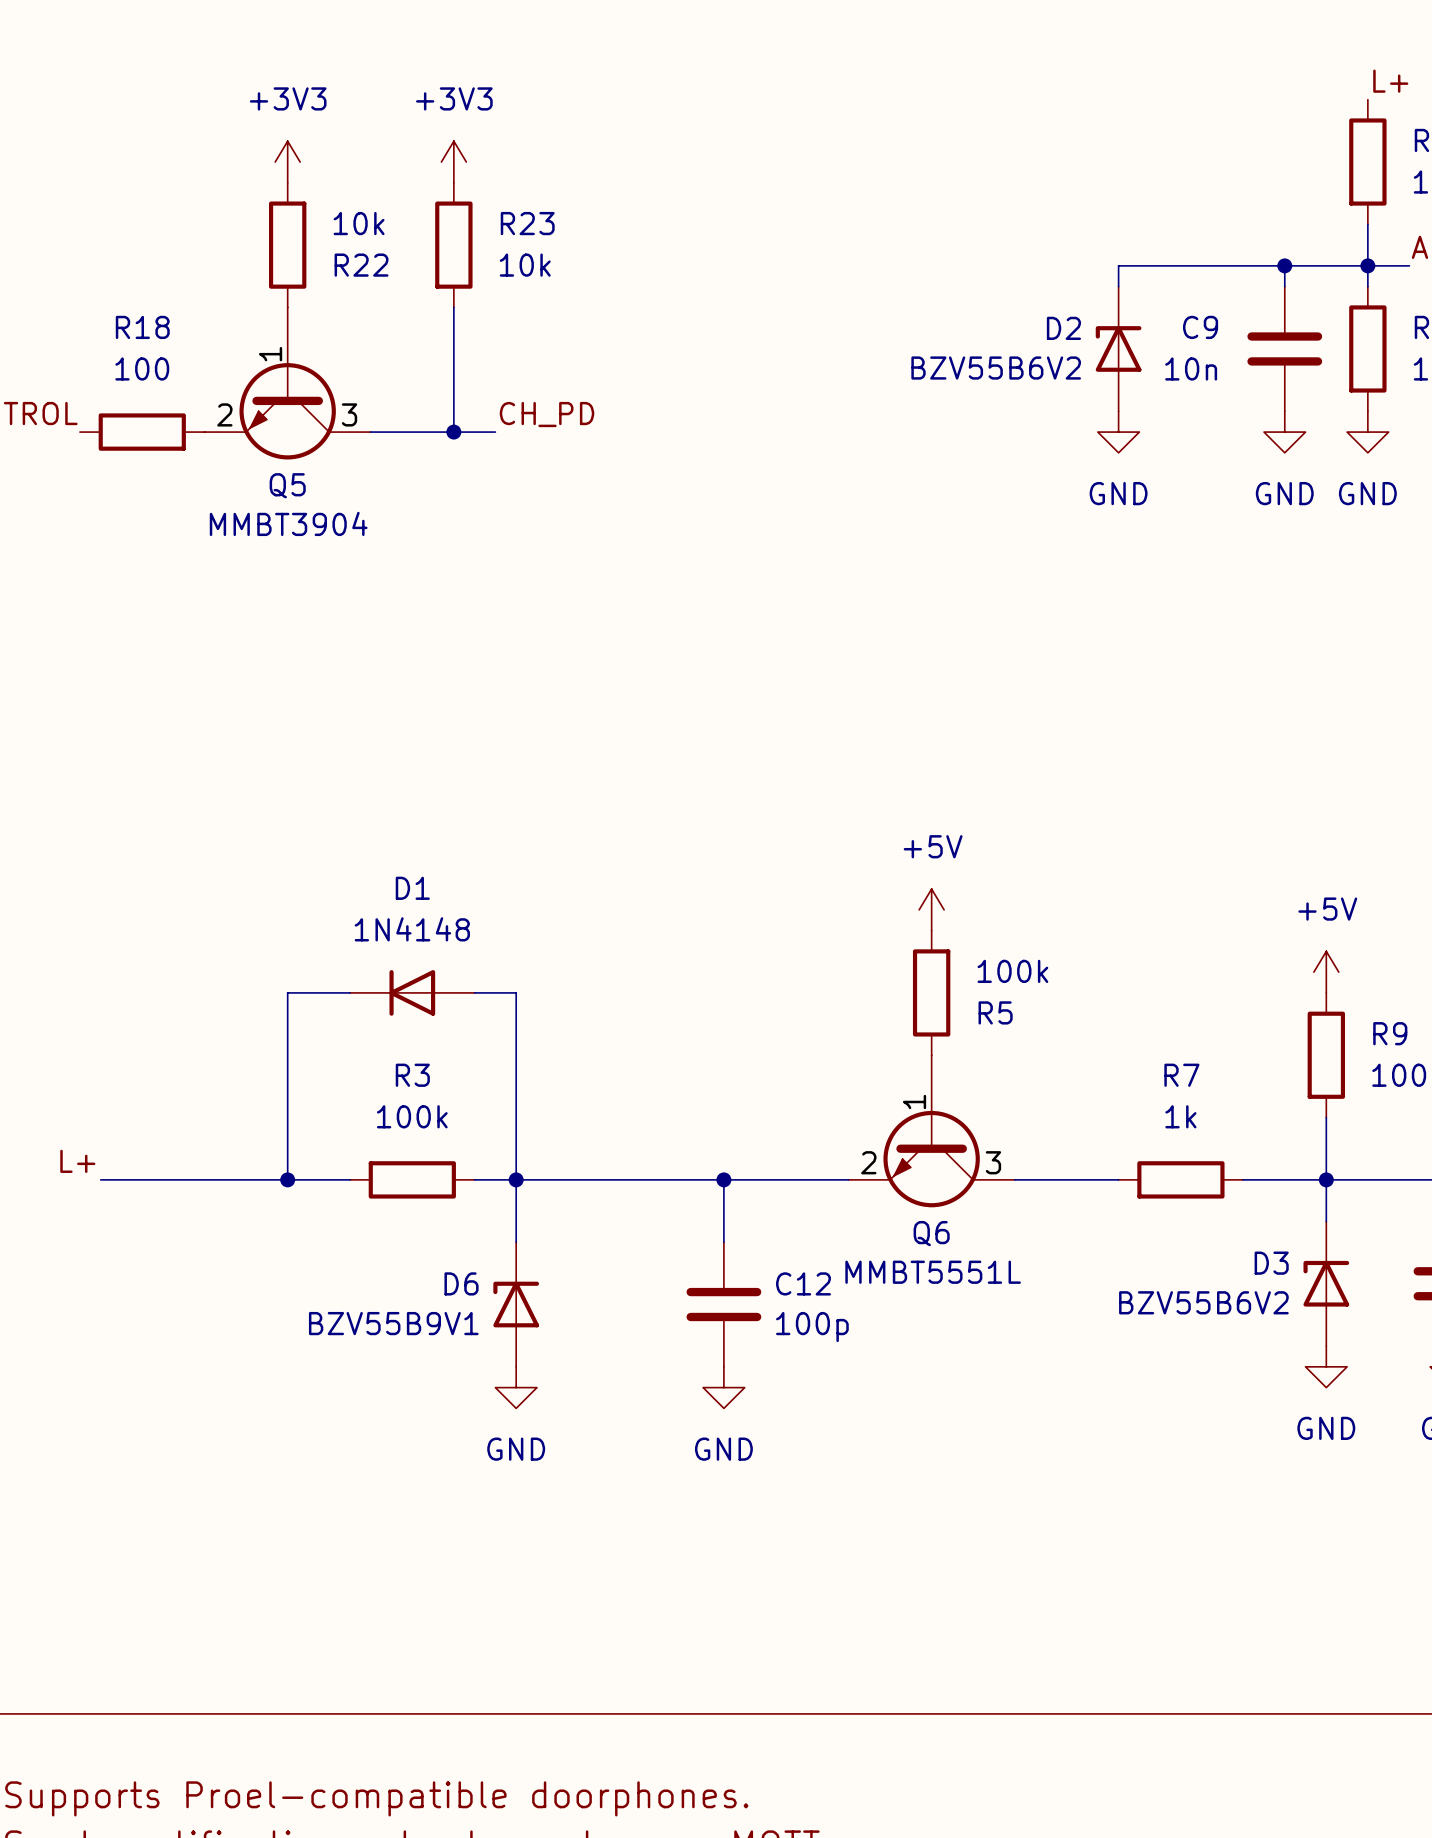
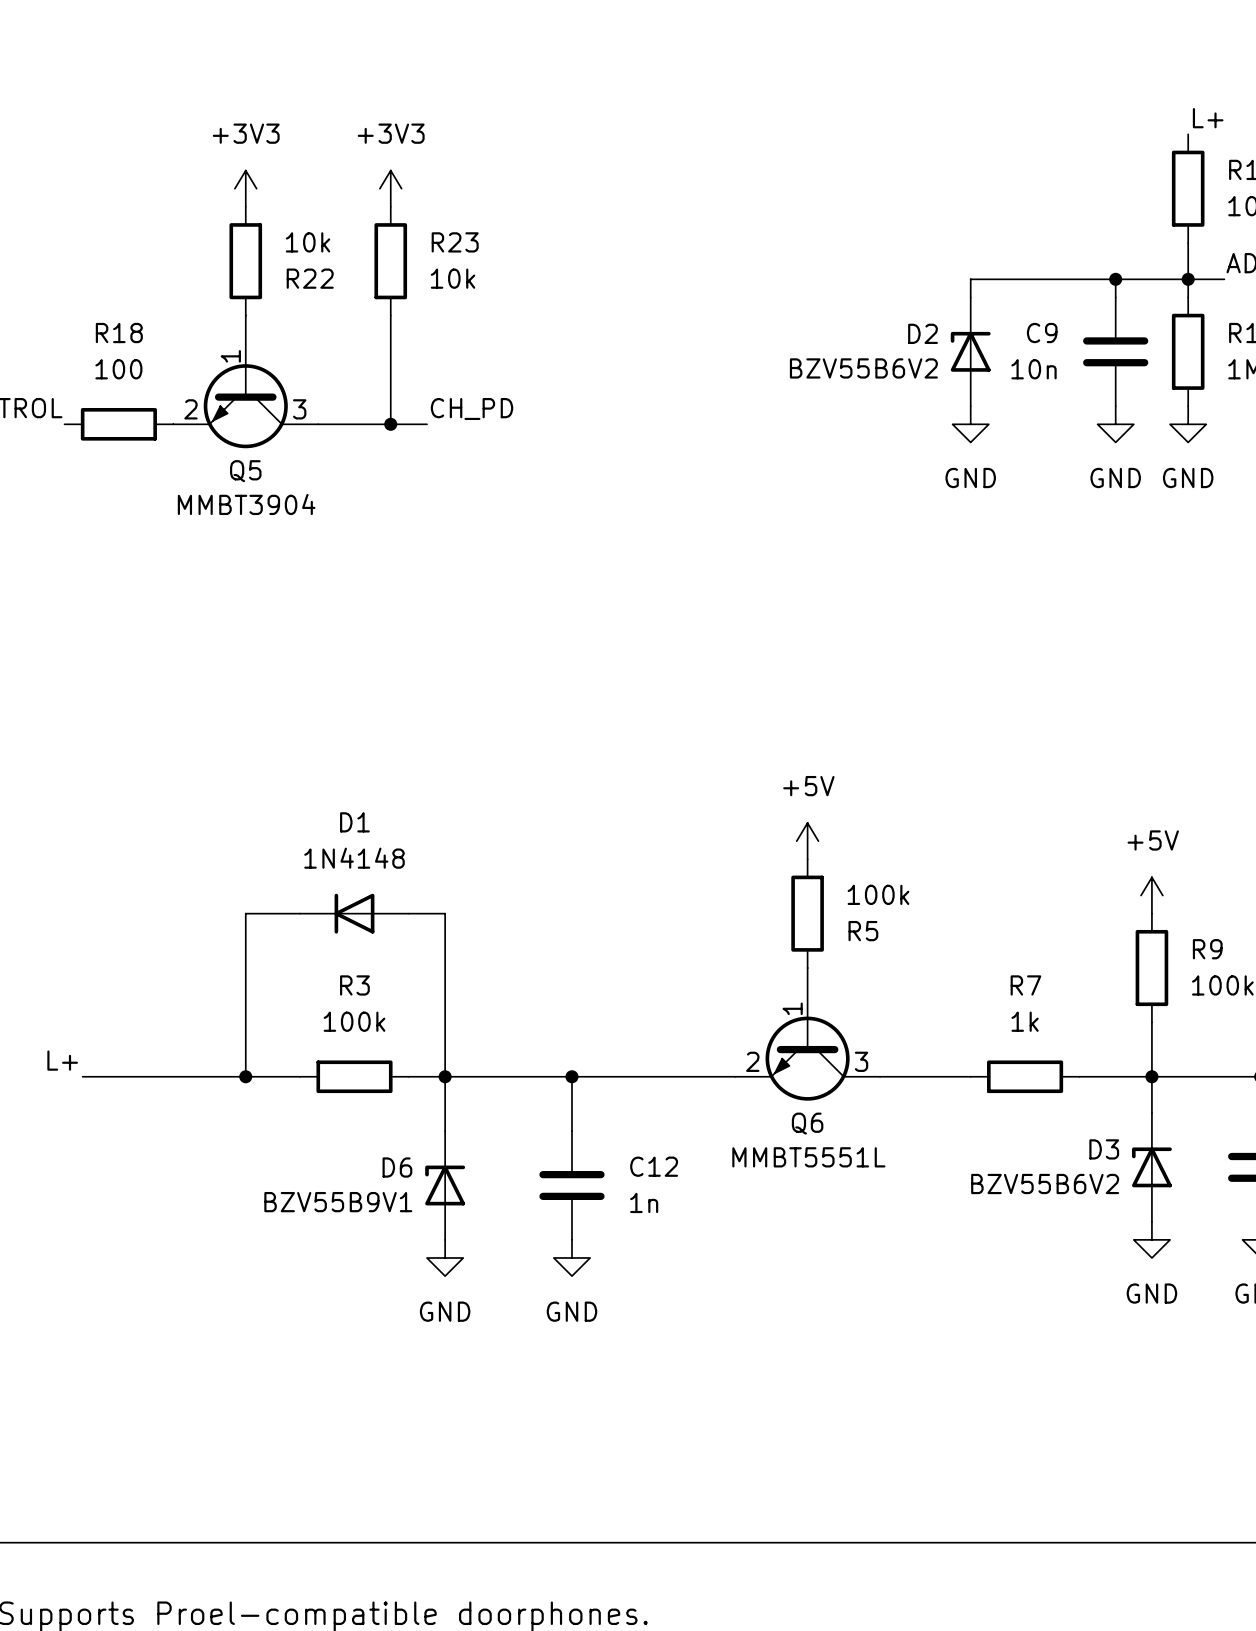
wire: (723, 1179) (723, 1242) -> (571, 1076) (571, 1131)
junction position: (723, 1179) -> (571, 1076)
C12 name position: C12 (803, 1283) -> C12 (654, 1166)
C12 position: (723, 1304) -> (571, 1185)
C12 value: 100p (812, 1327) -> 1n (644, 1202)
power symbol position: GND (723, 1387) -> GND (571, 1257)

